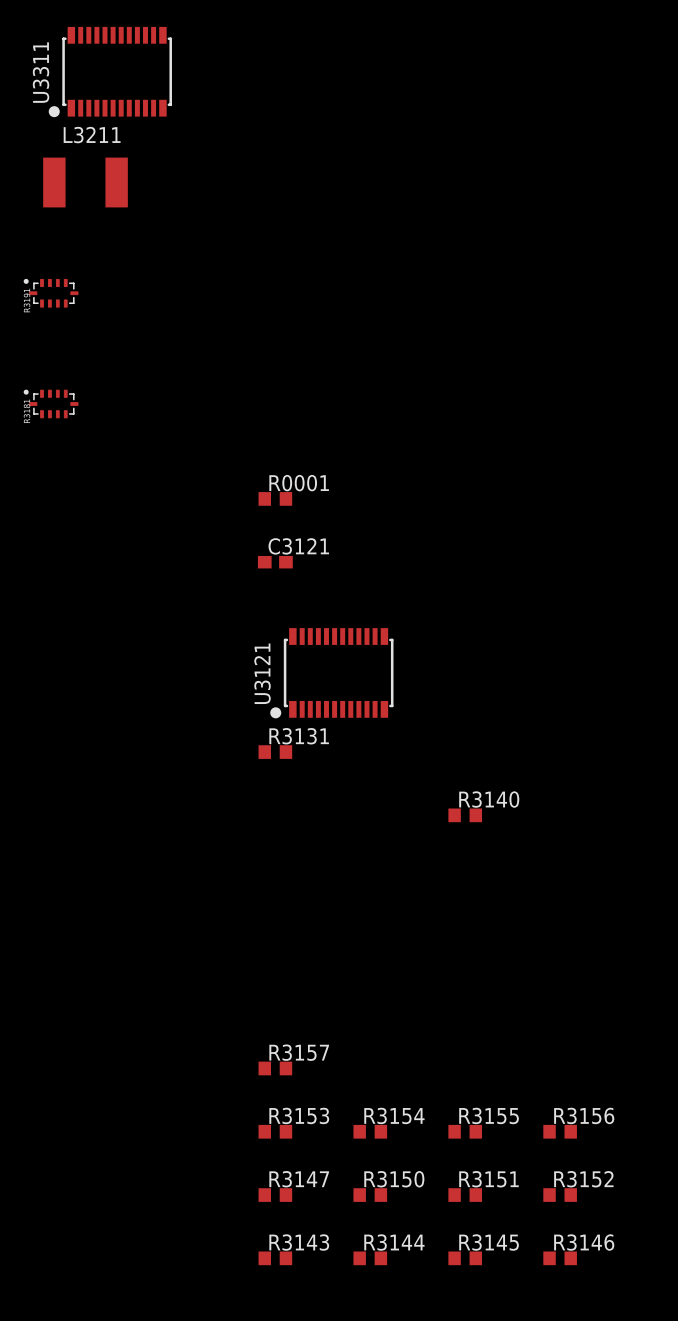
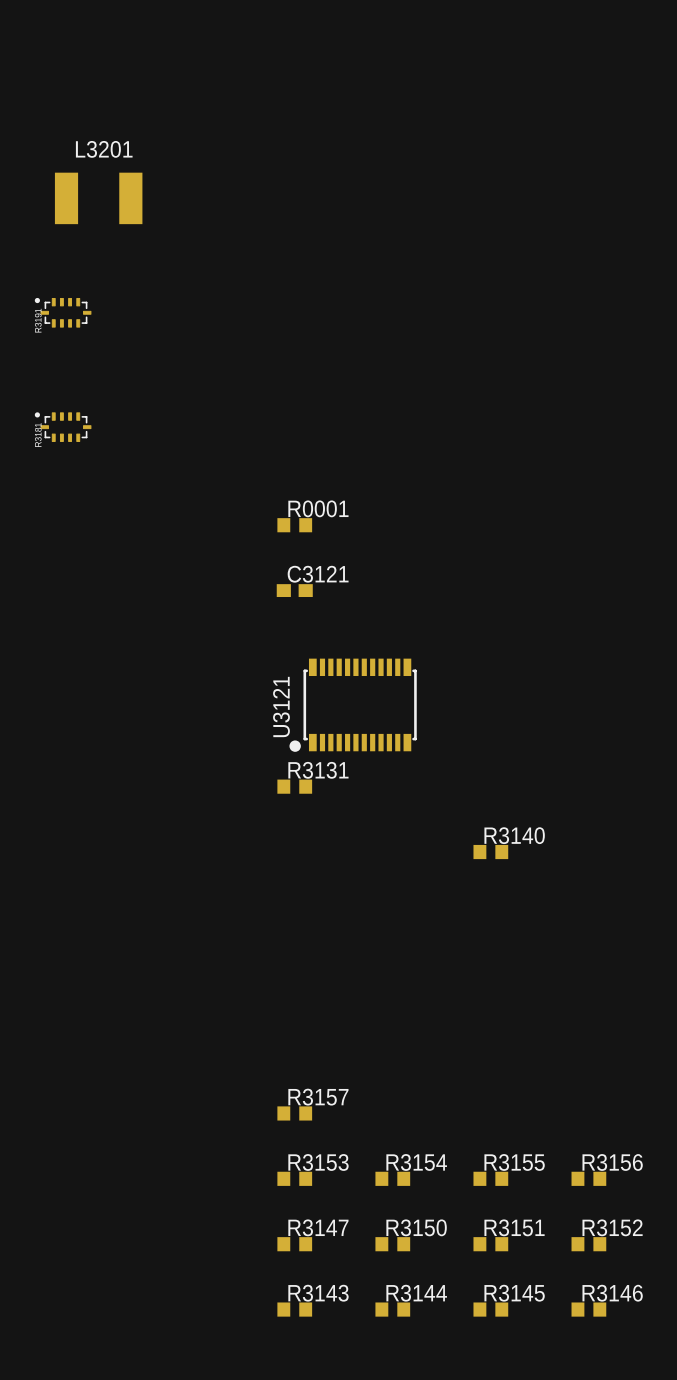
U3311: (110, 72) -> none
L3211 name: L3211 (92, 135) -> L3201 (104, 149)

